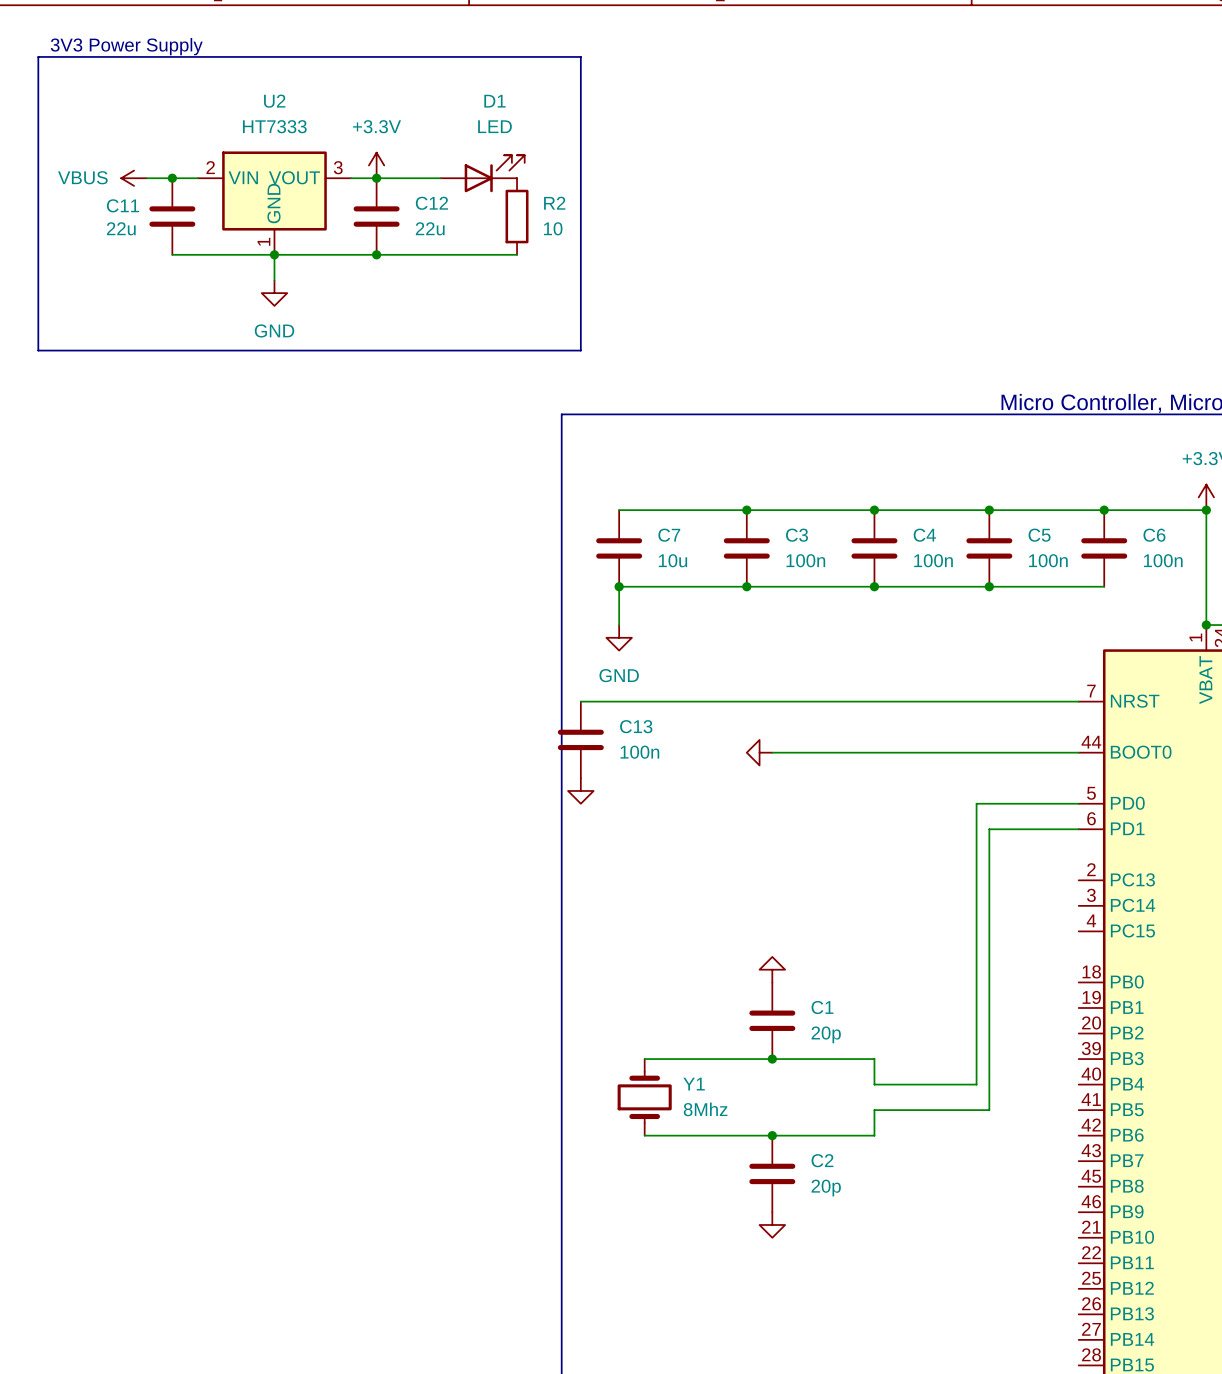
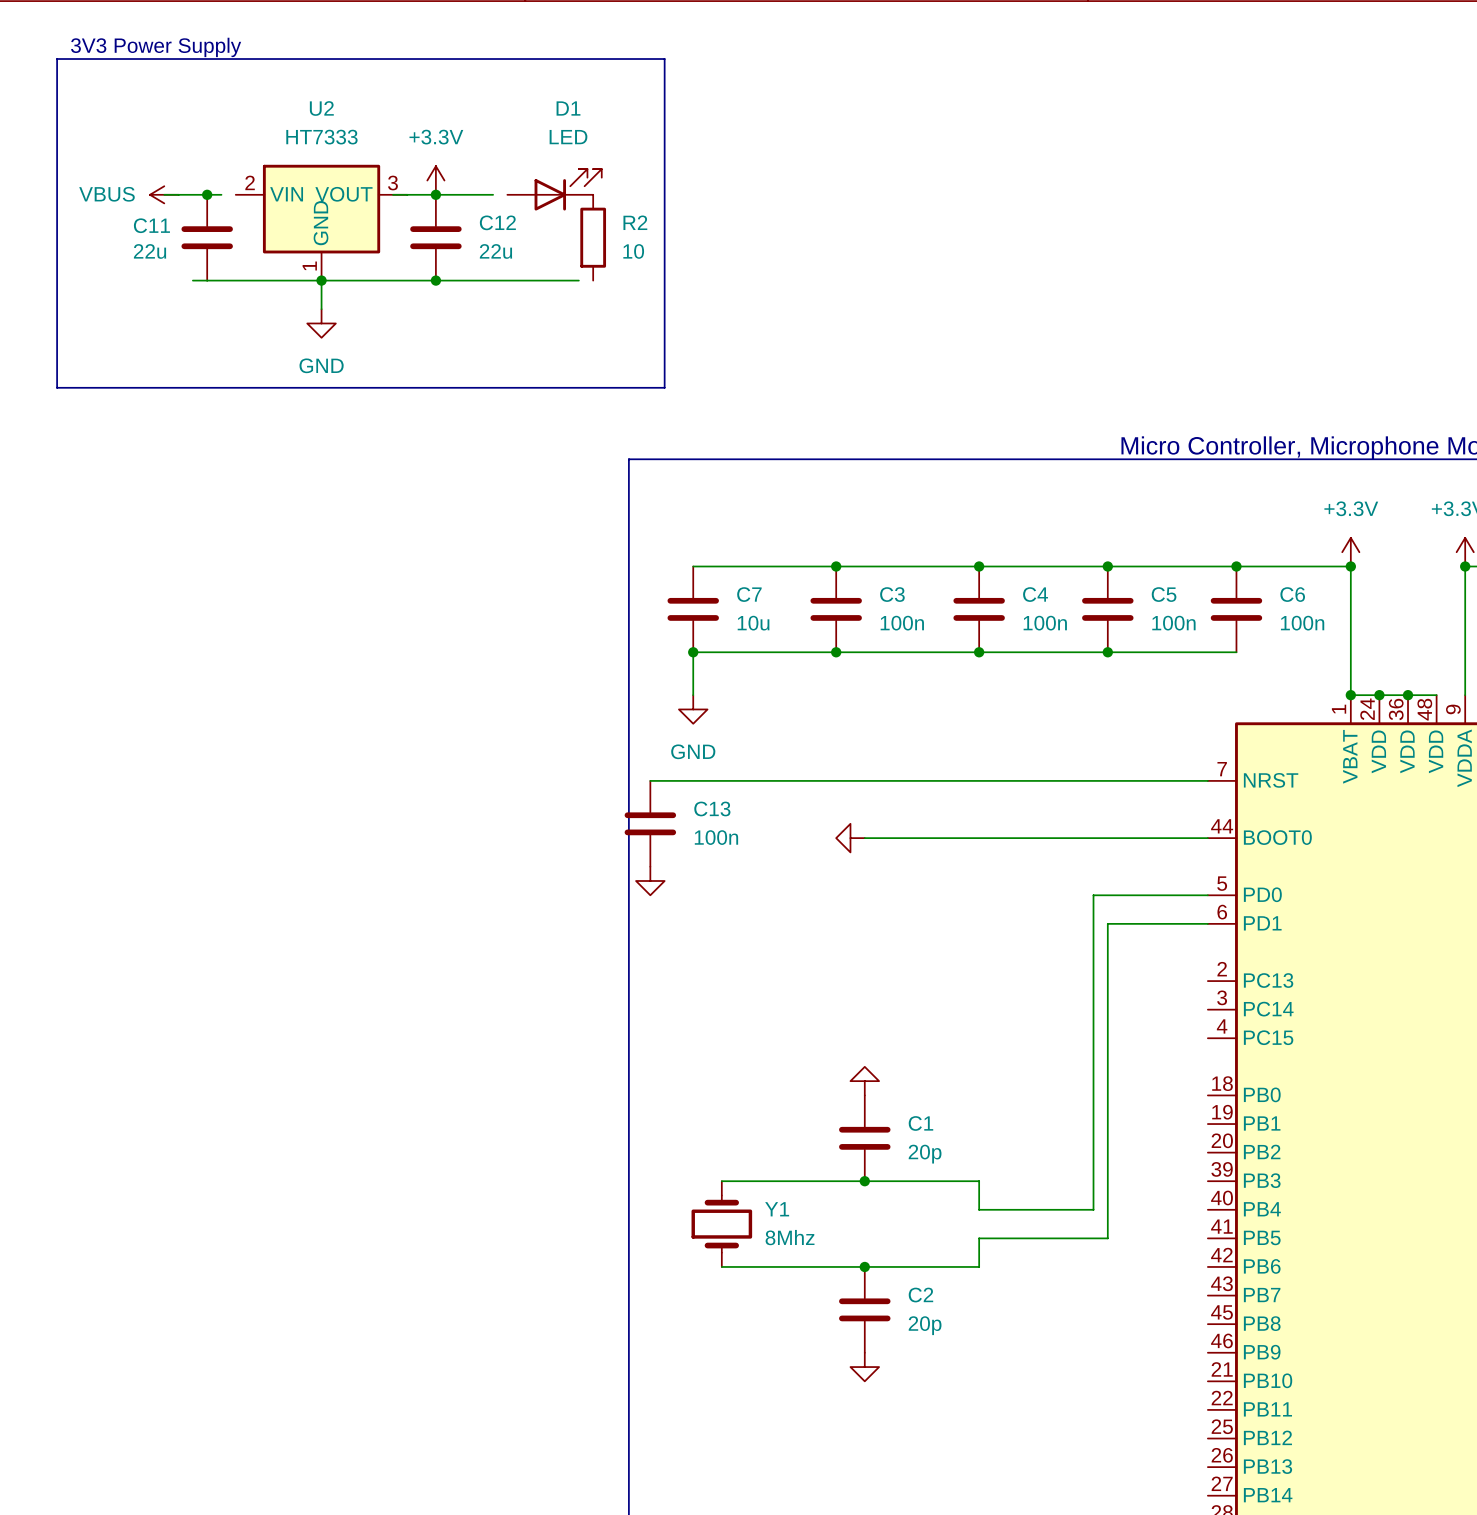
text position: 3V3 Power Supply (126, 46) -> 3V3 Power Supply (156, 47)
line: (51, 56) (38, 56) (38, 350) (51, 350) -> (57, 59) (57, 387)
line: (580, 56) (580, 350) -> (650, 59) (664, 59) (664, 387) (650, 387)
power symbol position: +3.3V (376, 165) -> +3.3V (435, 180)
D1 position: (482, 173) -> (554, 189)
power symbol position: VBUS (134, 178) -> VBUS (164, 194)
junction position: (172, 178) -> (207, 194)
junction position: (376, 178) -> (435, 194)
U2 position: (274, 203) -> (321, 222)
C11 position: (172, 216) -> (207, 237)
C12 position: (376, 216) -> (435, 237)
R2 position: (517, 216) -> (593, 237)
wire: (274, 254) (274, 280) -> (321, 280) (321, 309)
junction position: (274, 254) -> (321, 280)
junction position: (376, 254) -> (435, 280)
power symbol position: GND (274, 293) -> GND (321, 323)

